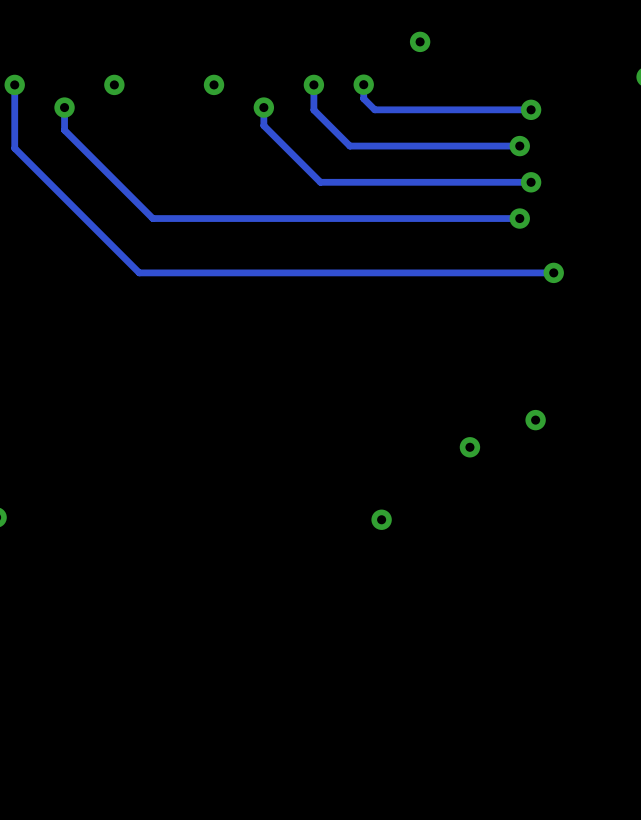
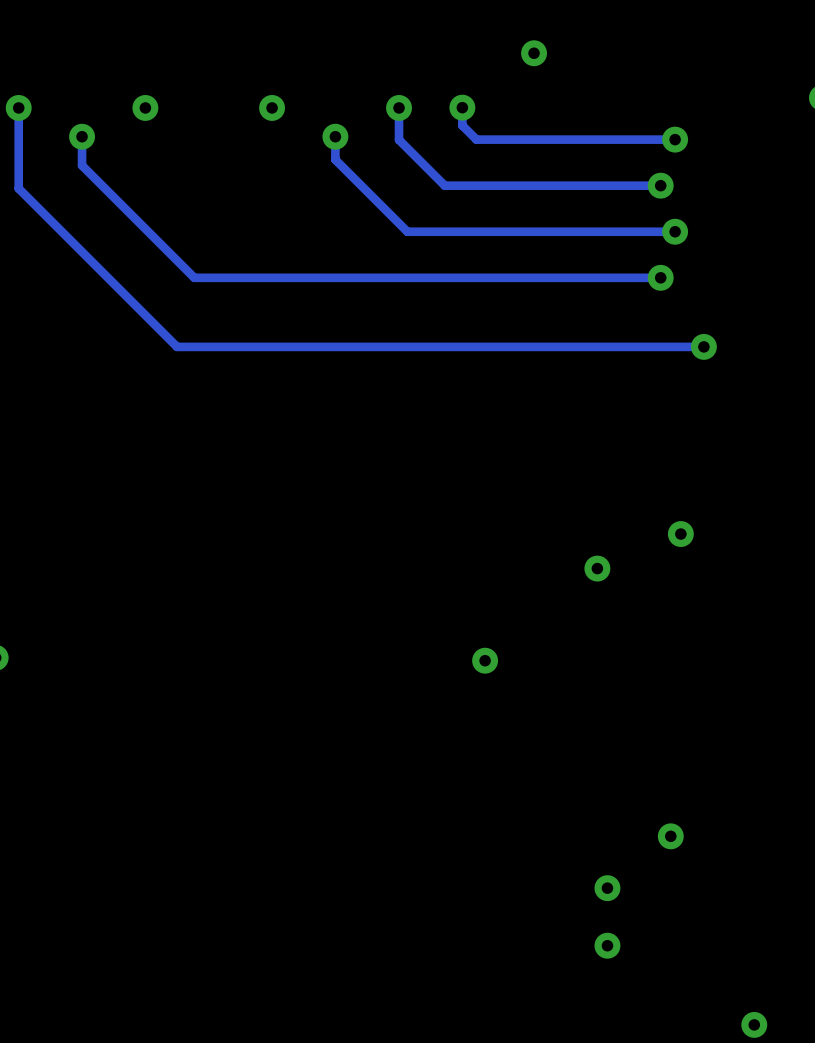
via: none -> (670, 836)
via: none -> (607, 888)
via: none -> (607, 945)
via: none -> (754, 1024)

